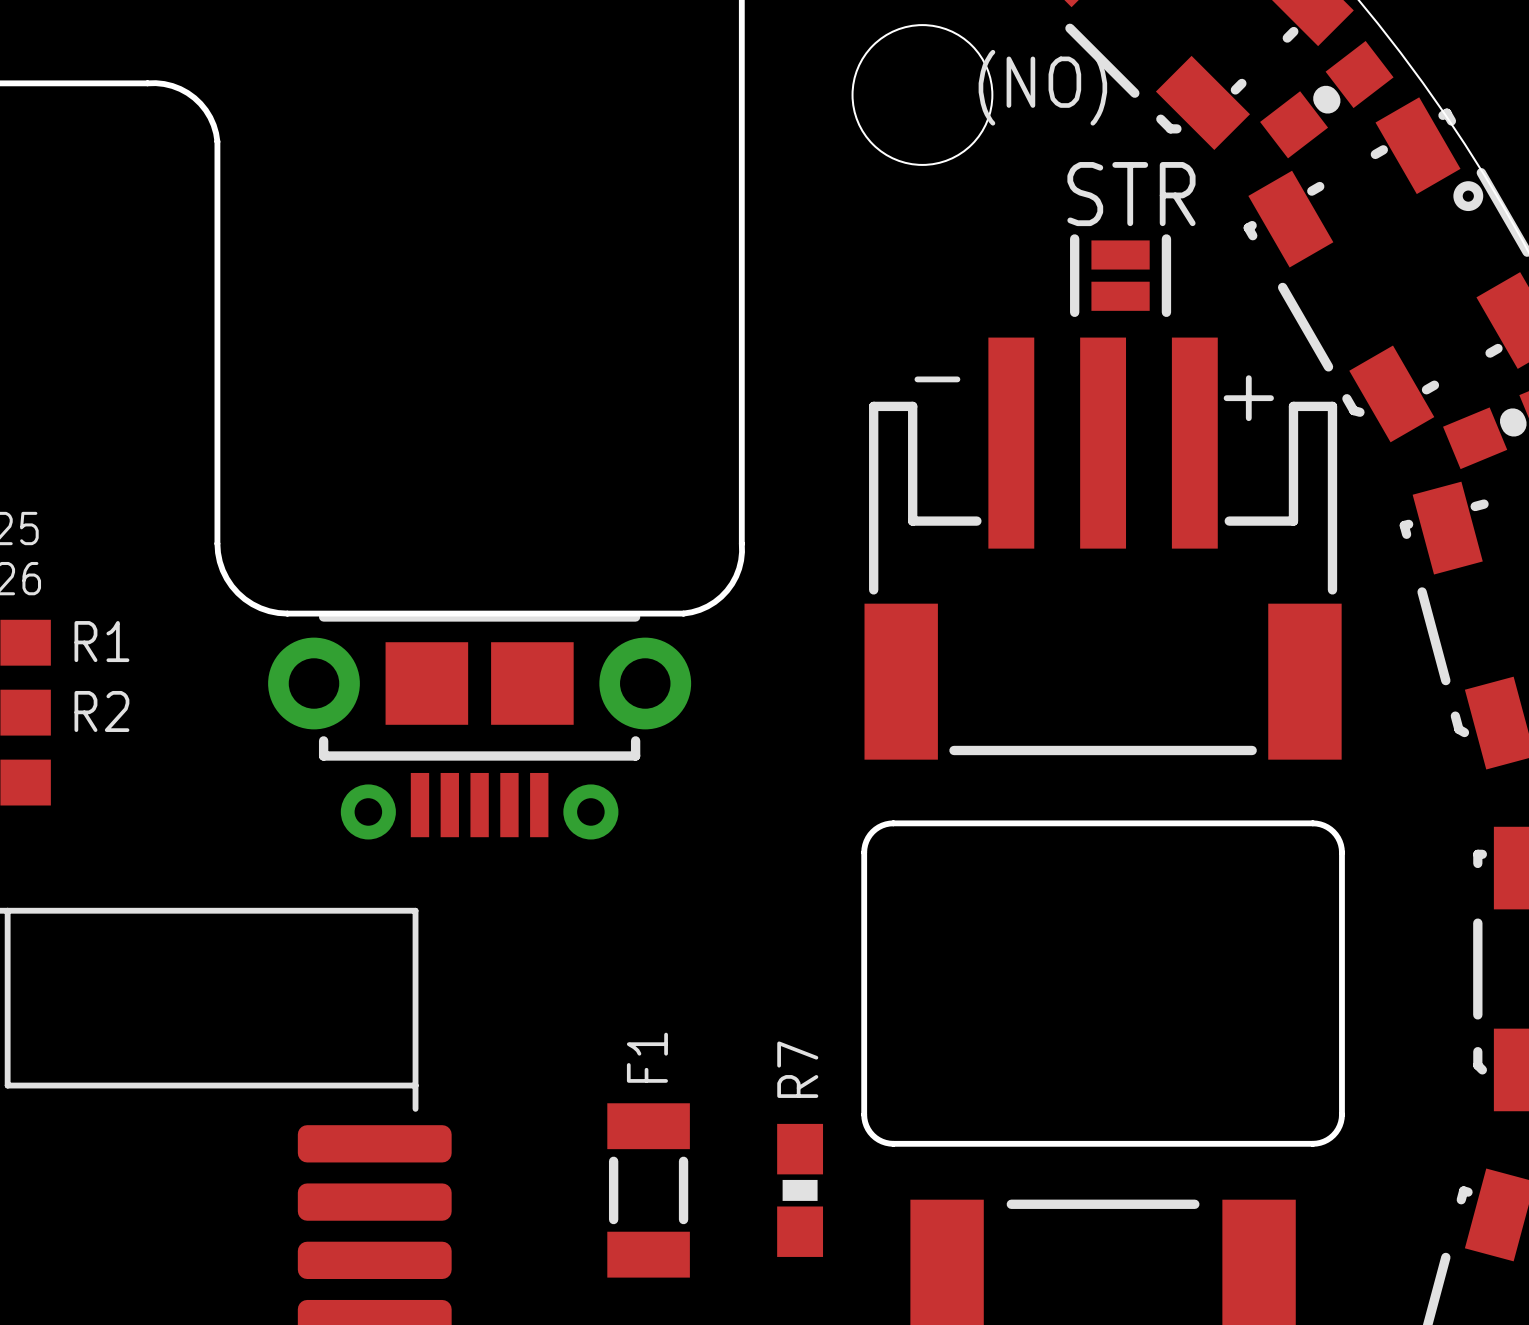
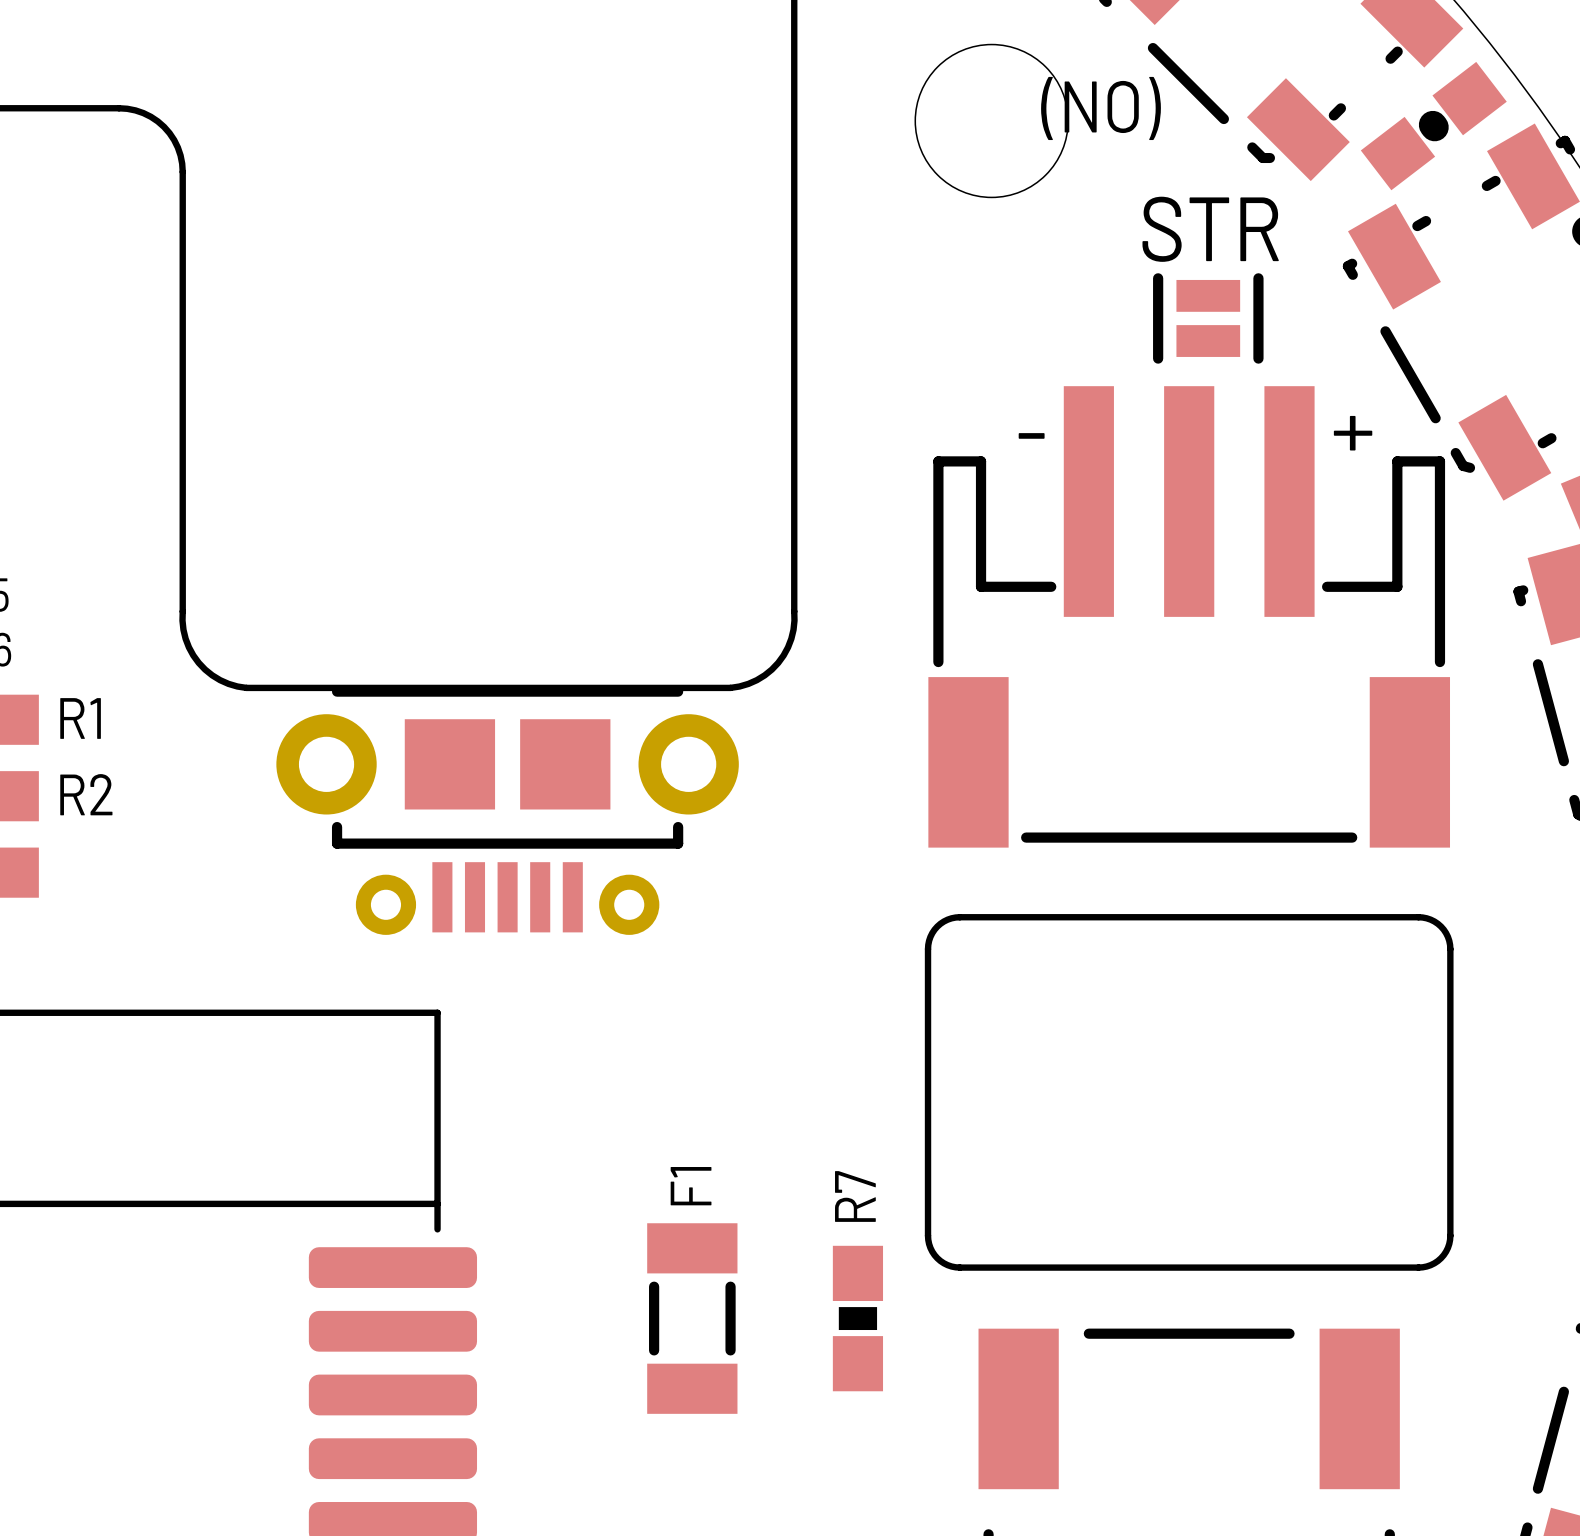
board edge: (124, 83) (155, 83) (180, 89) (200, 103) (213, 125) (217, 141) (218, 552) (226, 578) (244, 599) (269, 611) (287, 613) -> (119, 108) (135, 110) (157, 121) (174, 140) (182, 163) (182, 620) (185, 638) (193, 655) (205, 669) (228, 683) (246, 687) (297, 687)

